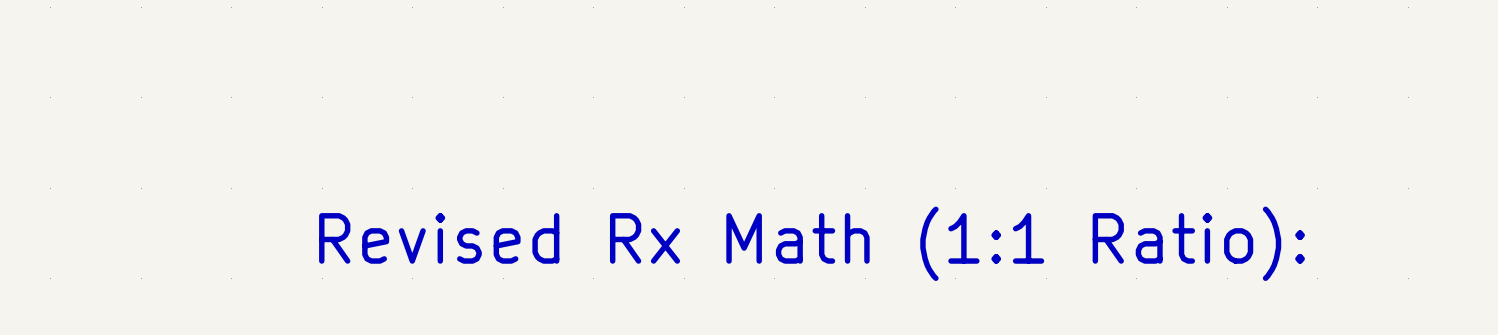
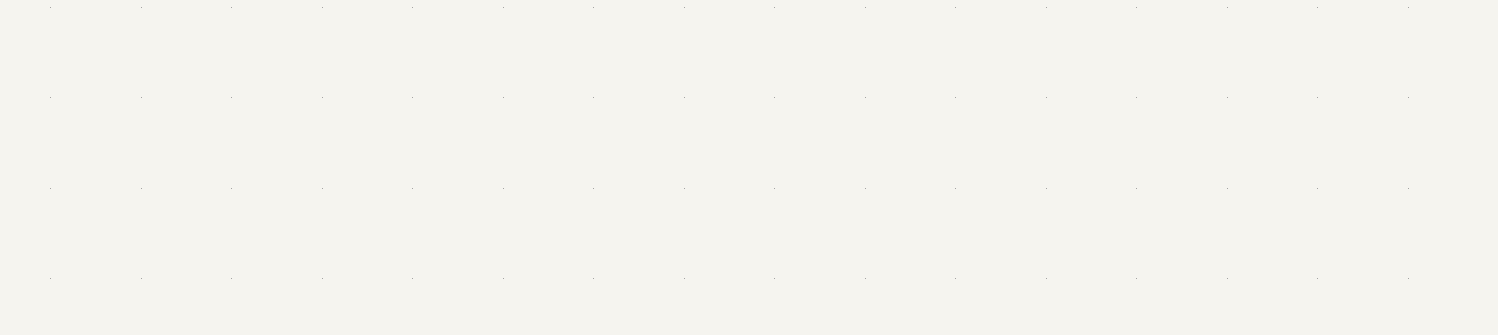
text: Revised Rx Math (1:1 Ratio): (812, 243) -> none

